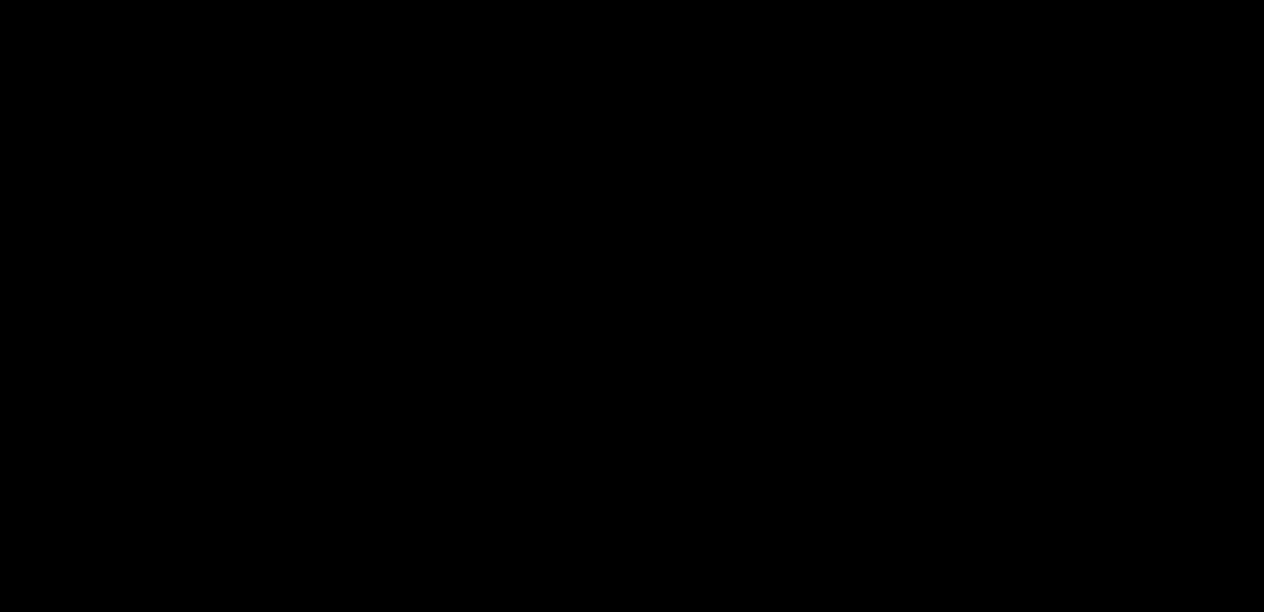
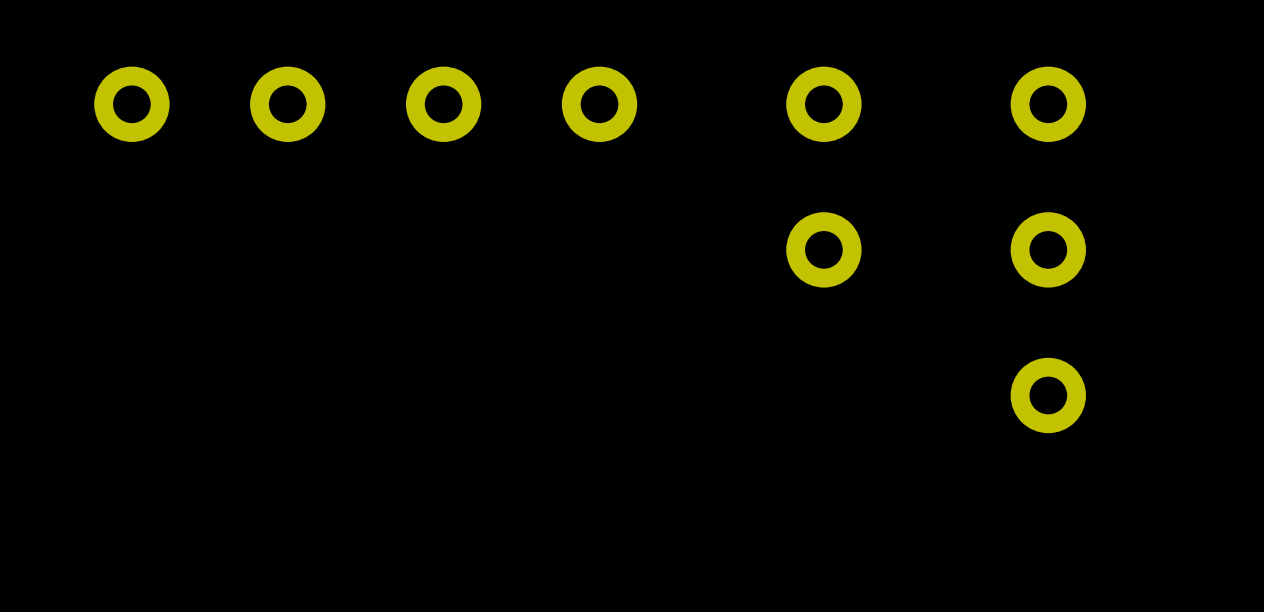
part: none -> (131, 104)
part: none -> (287, 104)
part: none -> (443, 104)
part: none -> (599, 104)
part: none -> (823, 104)
part: none -> (1048, 104)
part: none -> (823, 249)
part: none -> (1048, 249)
part: none -> (1048, 395)

